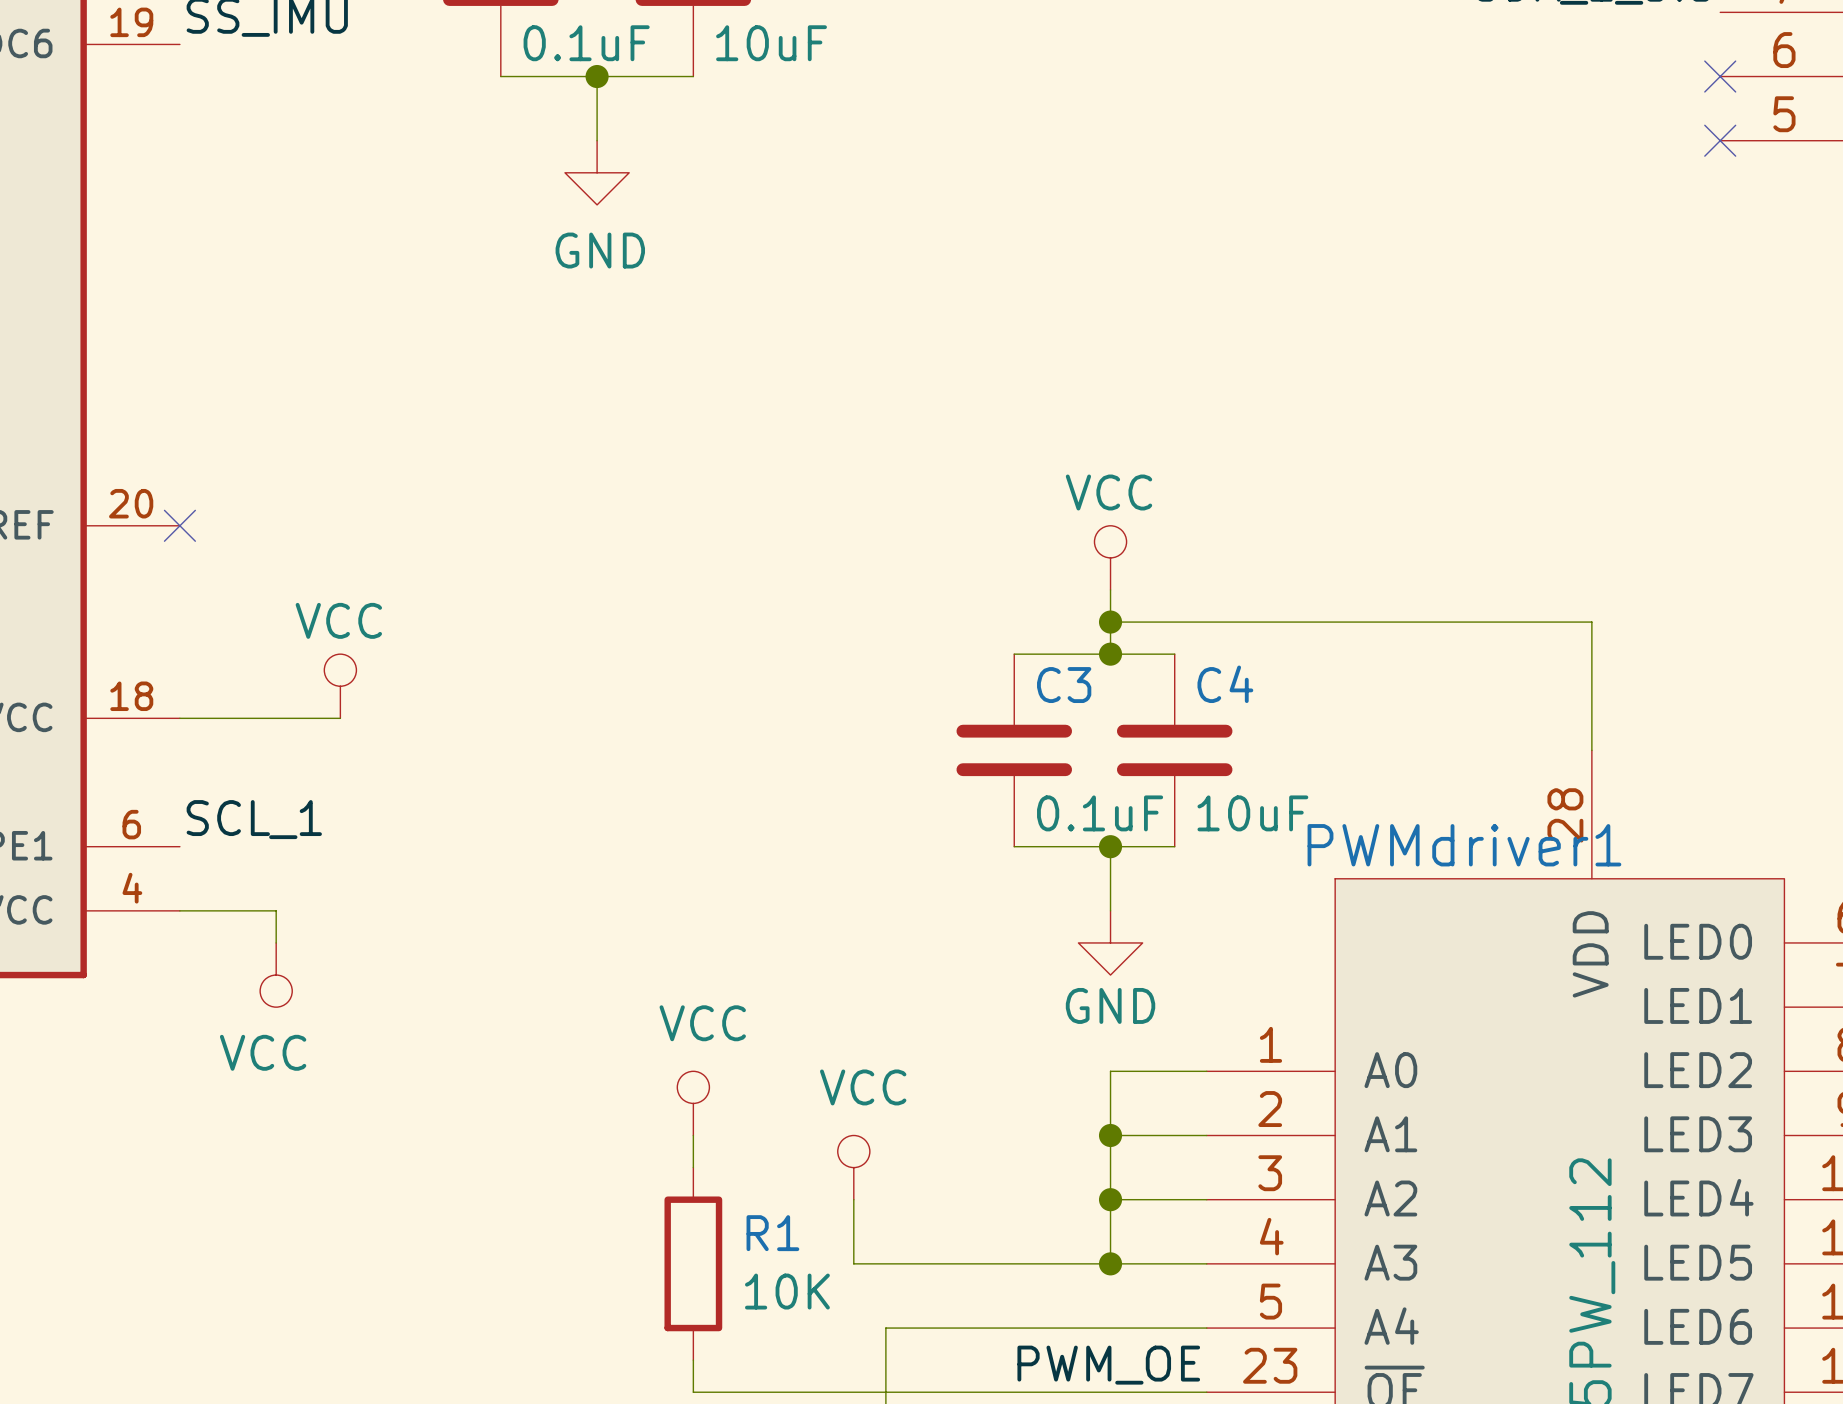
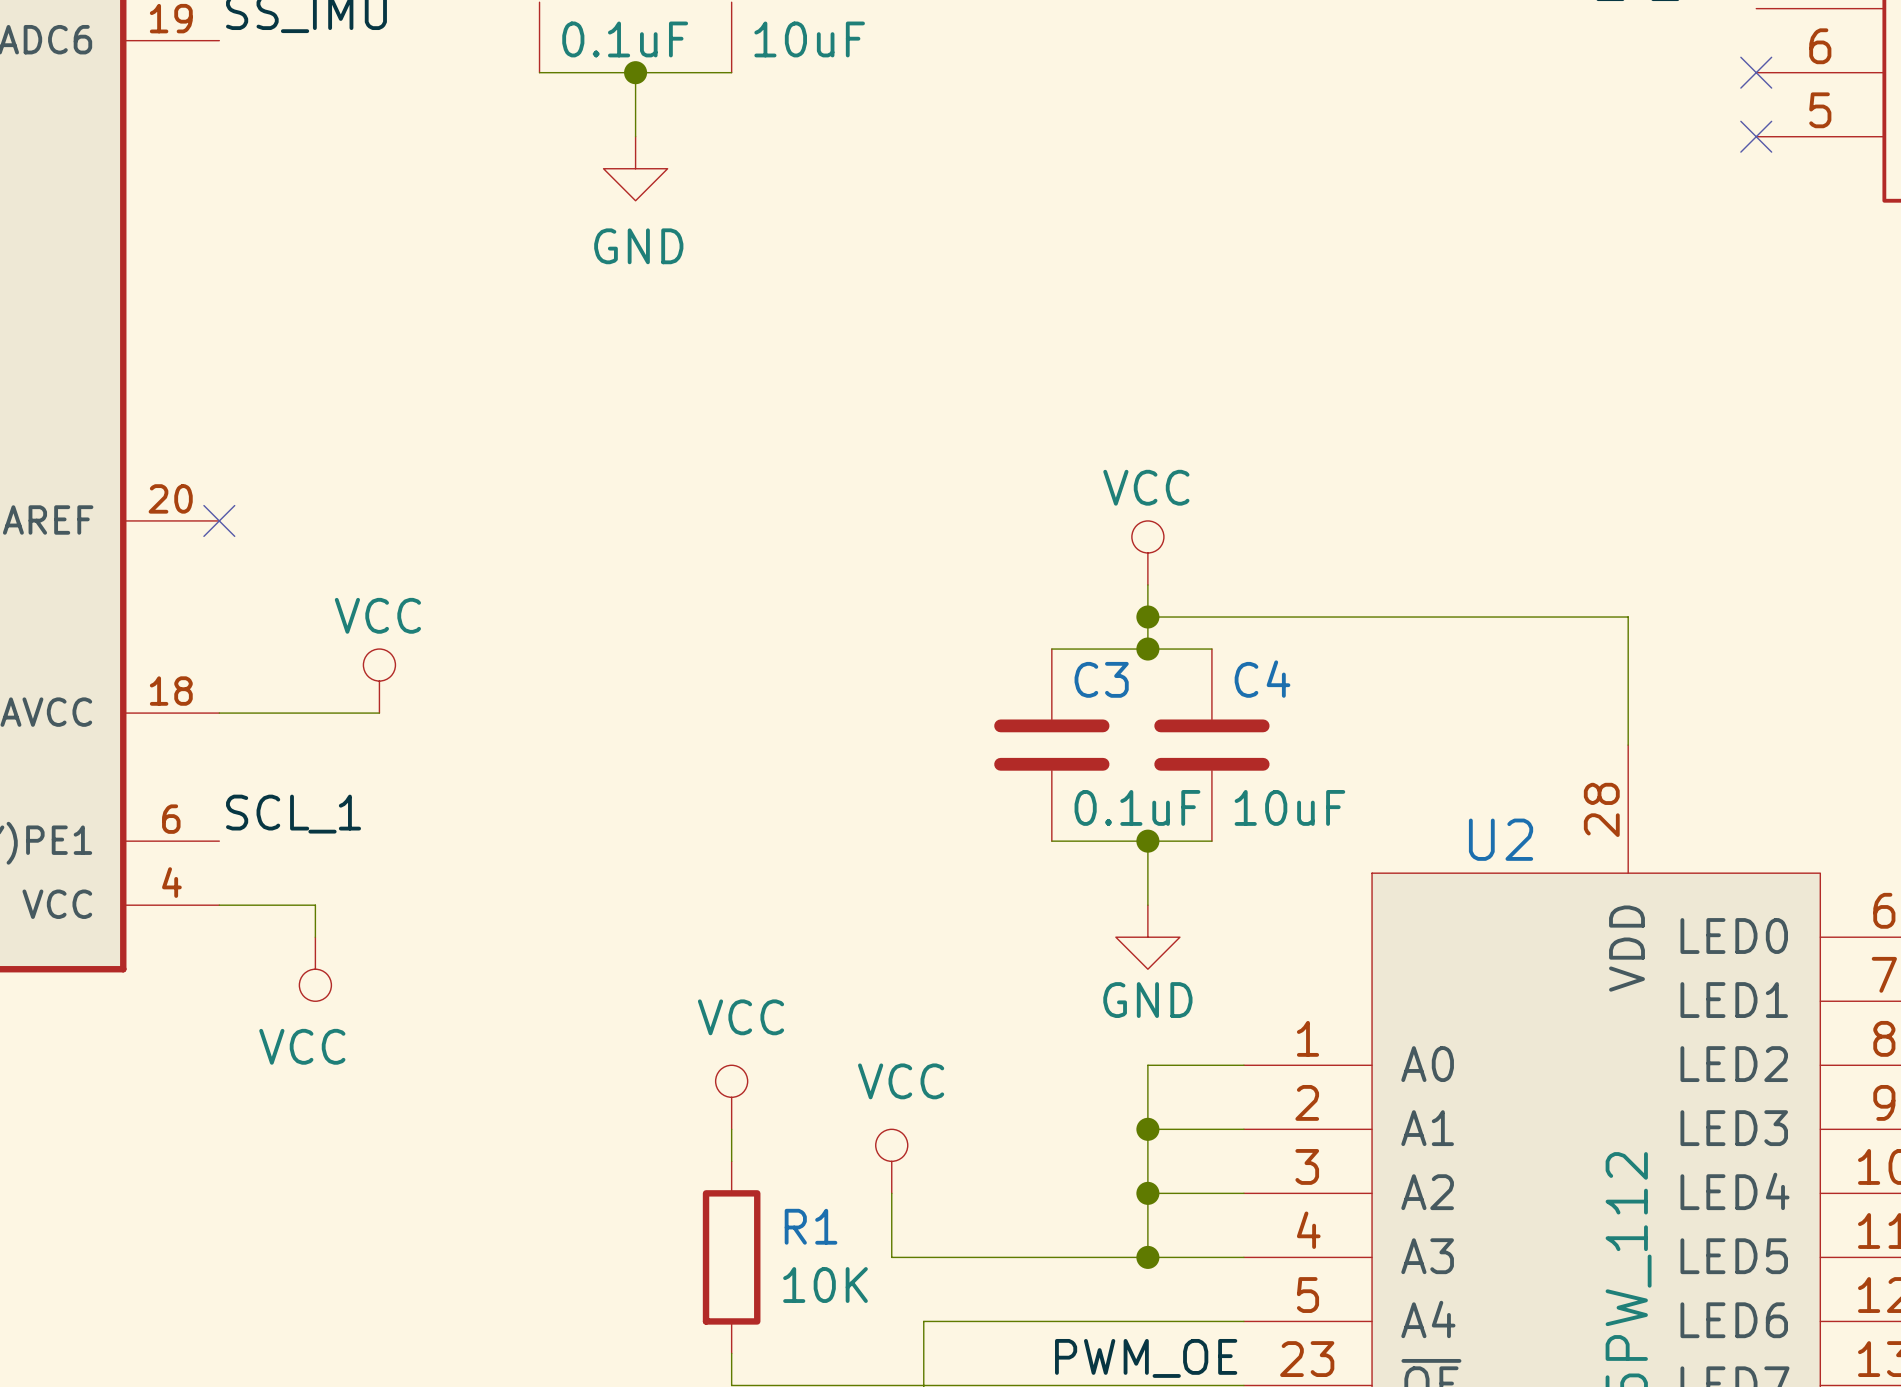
PWMdriver1 name: PWMdriver1 (1464, 845) -> U2 (1501, 839)

